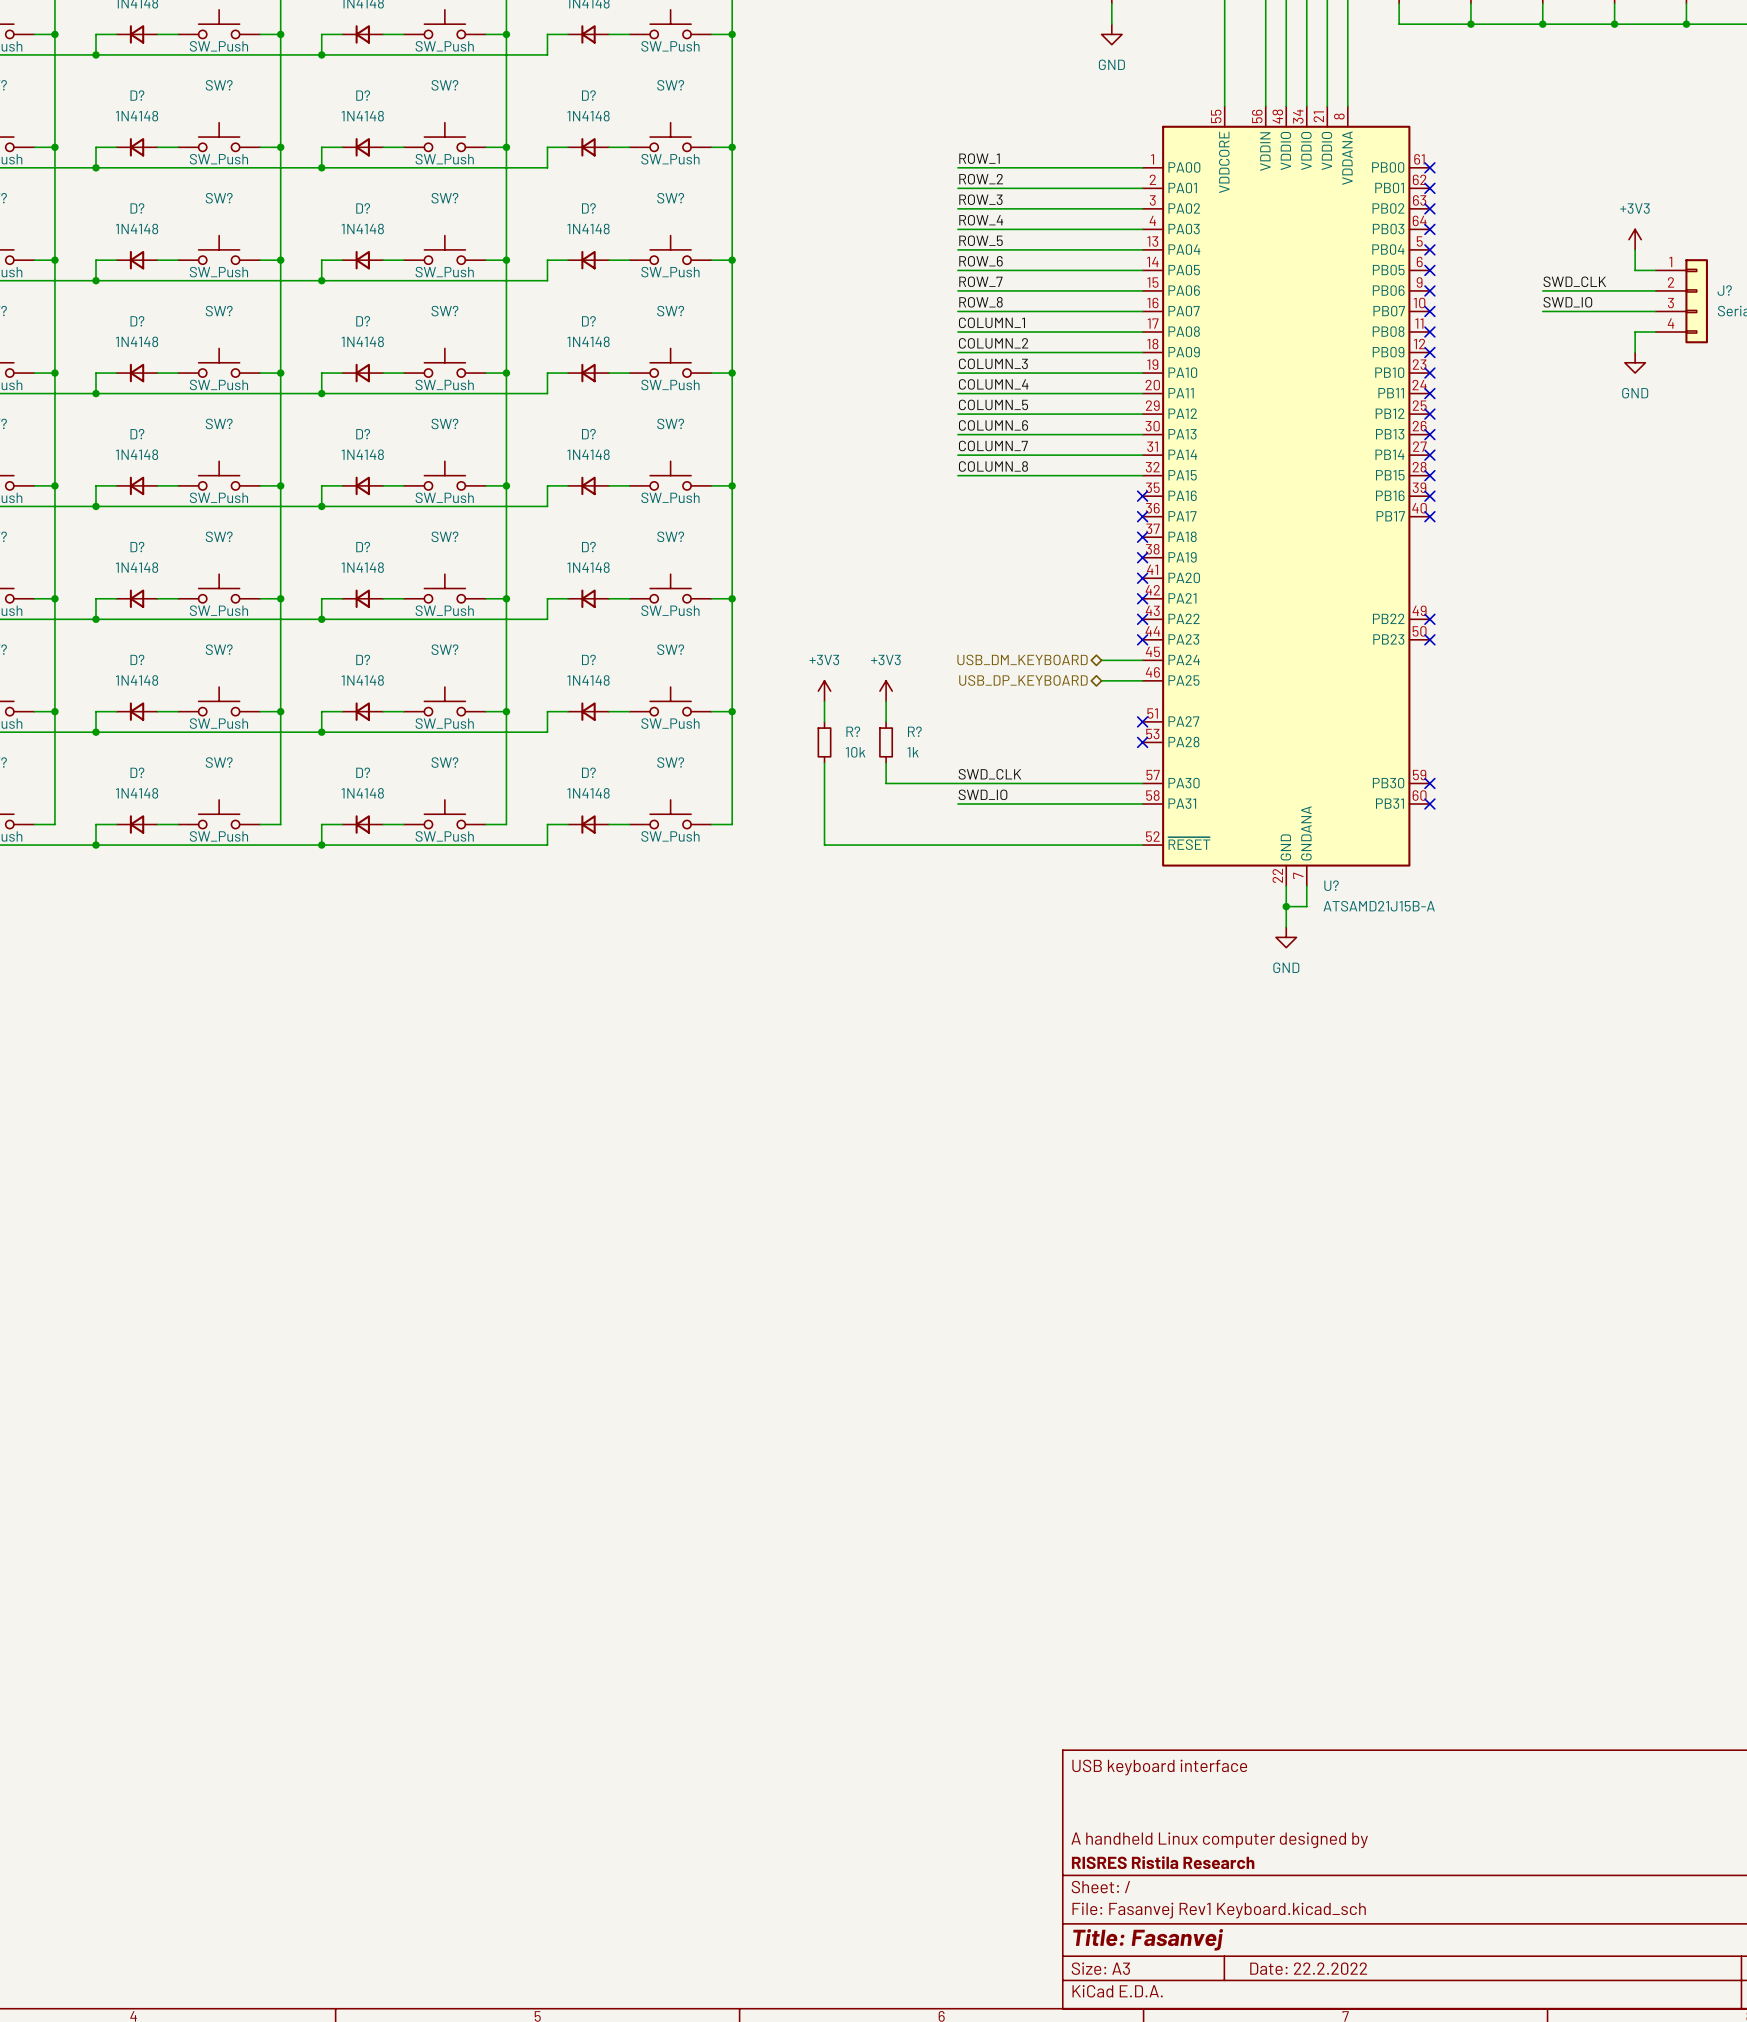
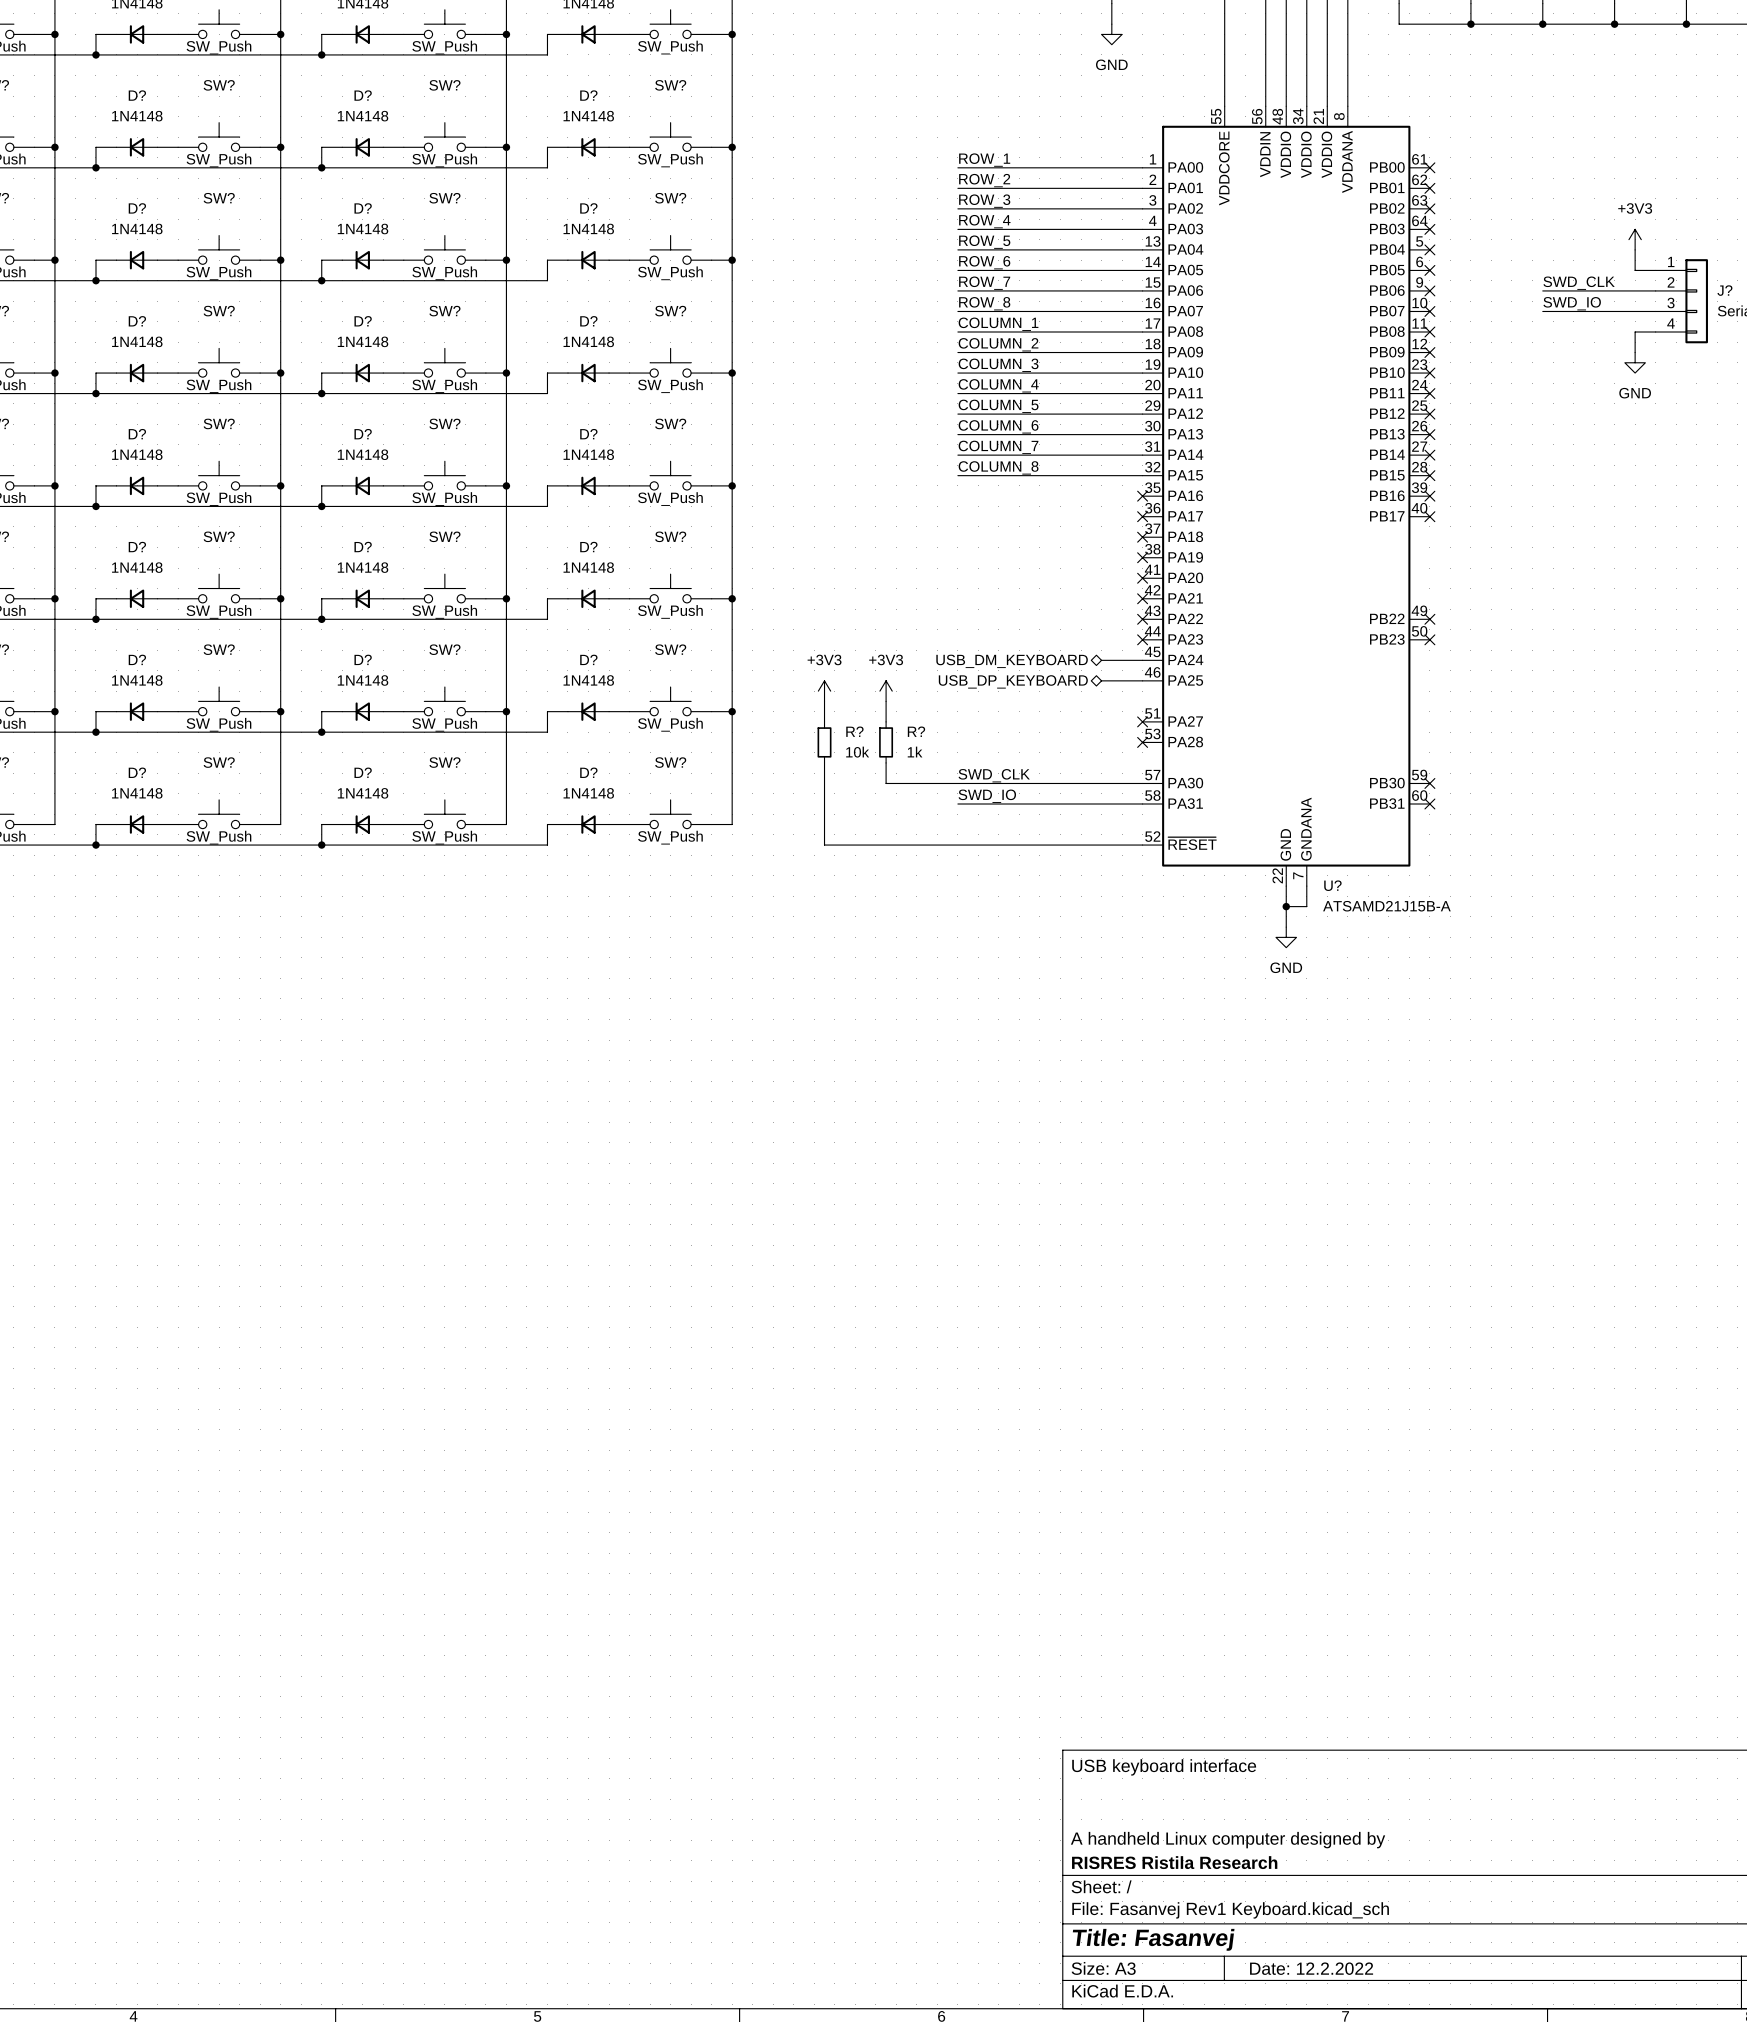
title block: Date: 22.2.2022 (1308, 1968) -> Date: 12.2.2022 (1311, 1968)

